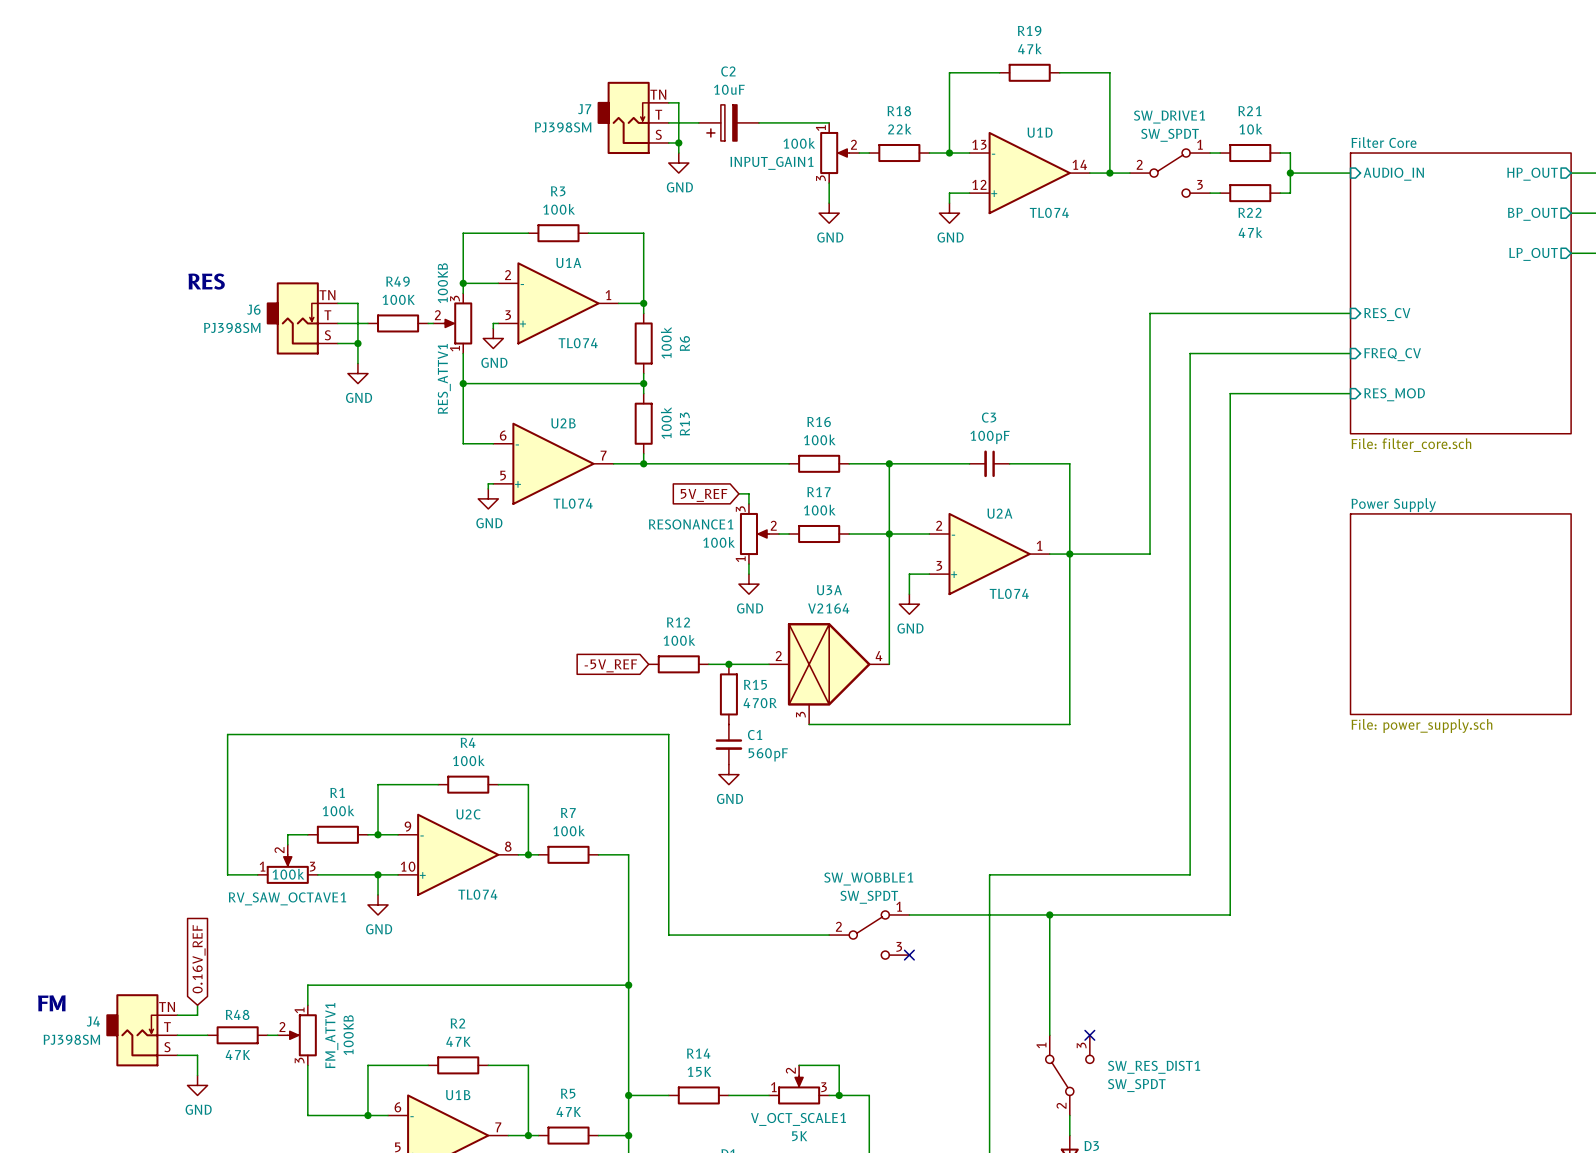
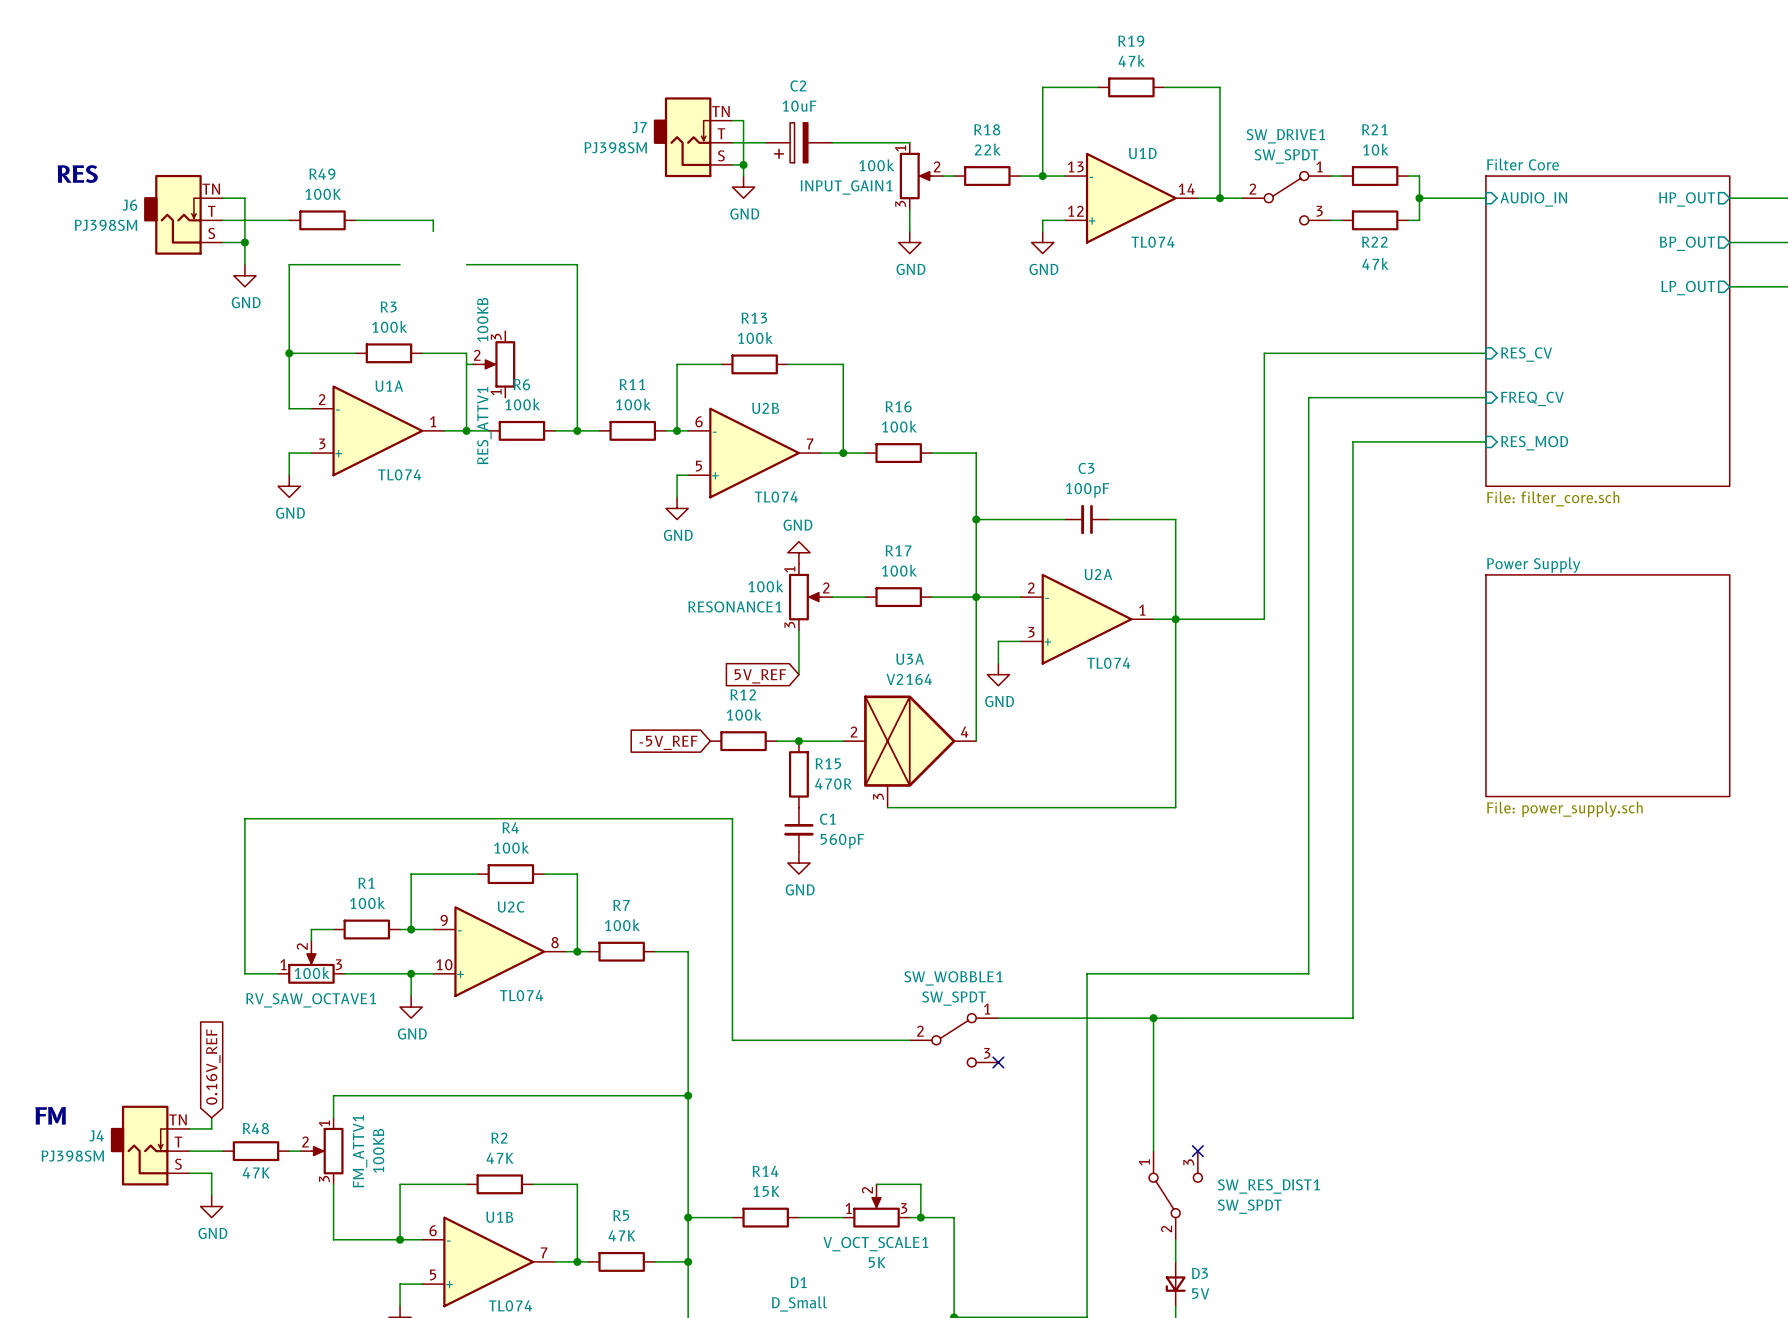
wire: none -> (222, 220) (289, 220)
wire: none -> (355, 220) (433, 220) (433, 231)
junction: none -> (244, 242)
wire: none -> (400, 264) (289, 264) (289, 408) (311, 408)
wire: (463, 233) (463, 293) -> (505, 264) (466, 264)
wire: none -> (577, 264) (577, 430)
R3 position: (558, 233) -> (388, 353)
wire: (588, 233) (643, 233) (643, 313) -> none
power symbol: none -> GND (244, 275)
text position: RES (206, 281) -> RES (77, 174)
wire: (463, 283) (498, 283) -> none
junction: (463, 283) -> none
wire: (337, 303) (357, 303) (357, 363) -> (222, 198) (244, 198) (244, 264)
U1A position: (558, 303) -> (377, 430)
wire: (618, 303) (643, 303) -> none
junction: (643, 303) -> none
junction: none -> (289, 353)
wire: none -> (422, 353) (466, 353) (466, 430)
J6 position: (302, 318) -> (183, 214)
wire: (337, 323) (367, 323) -> none
R49 position: (398, 323) -> (322, 220)
wire: (498, 323) (493, 323) (493, 328) -> none
wire: none -> (721, 364) (677, 364) (677, 430)
wire: none -> (787, 364) (843, 364) (843, 453)
power symbol: GND (493, 338) -> none
R6 value position: 100k (666, 342) -> 100k (522, 404)
wire: (337, 343) (357, 343) -> (222, 242) (244, 242)
junction: (357, 343) -> none
R6 rotation: 0° (643, 343) -> 90° clockwise (521, 430)
R6 position: (643, 343) -> (521, 430)
R6 name position: R6 (684, 343) -> R6 (521, 384)
wire: (463, 353) (463, 443) (493, 443) -> none
power symbol: GND (357, 373) -> none
wire: (643, 373) (643, 393) -> none
wire: none -> (444, 430) (488, 430)
junction: none -> (466, 430)
wire: (463, 383) (508, 383) -> none
junction: (463, 383) -> none
junction: none -> (577, 430)
wire: (548, 383) (608, 383) -> none
R11: none -> 100k (632, 430)
junction position: (643, 383) -> (677, 430)
wire: none -> (311, 453) (289, 453) (289, 475)
wire: none -> (821, 453) (865, 453)
junction: none -> (843, 453)
wire: none -> (688, 475) (677, 475) (677, 497)
R13 rotation: 0° (643, 423) -> 90° clockwise (754, 364)
R13 position: (643, 423) -> (754, 364)
R13 value position: 100k (666, 423) -> 100k (755, 337)
R13 name position: R13 (684, 424) -> R13 (754, 318)
power symbol: none -> GND (289, 486)
power symbol: none -> GND (677, 508)
wire: (643, 453) (643, 463) -> none
U2B position: (553, 463) -> (754, 453)
wire: (613, 463) (789, 463) -> none
junction: (643, 463) -> none
R16 position: (819, 463) -> (898, 453)
wire: (849, 463) (889, 463) -> (931, 453) (976, 453) (976, 519)
wire: (493, 483) (488, 483) (488, 488) -> none
power symbol: none -> GND (798, 552)
wire: (738, 493) (748, 493) (748, 503) -> none
global label position: 5V_REF (704, 495) -> 5V_REF (760, 676)
power symbol: GND (488, 498) -> none
RESONANCE1 flip: as is (754, 534) -> up-down (805, 597)
wire: none -> (798, 630) (798, 674)
wire: (748, 564) (748, 574) -> none
power symbol: GND (748, 584) -> none

